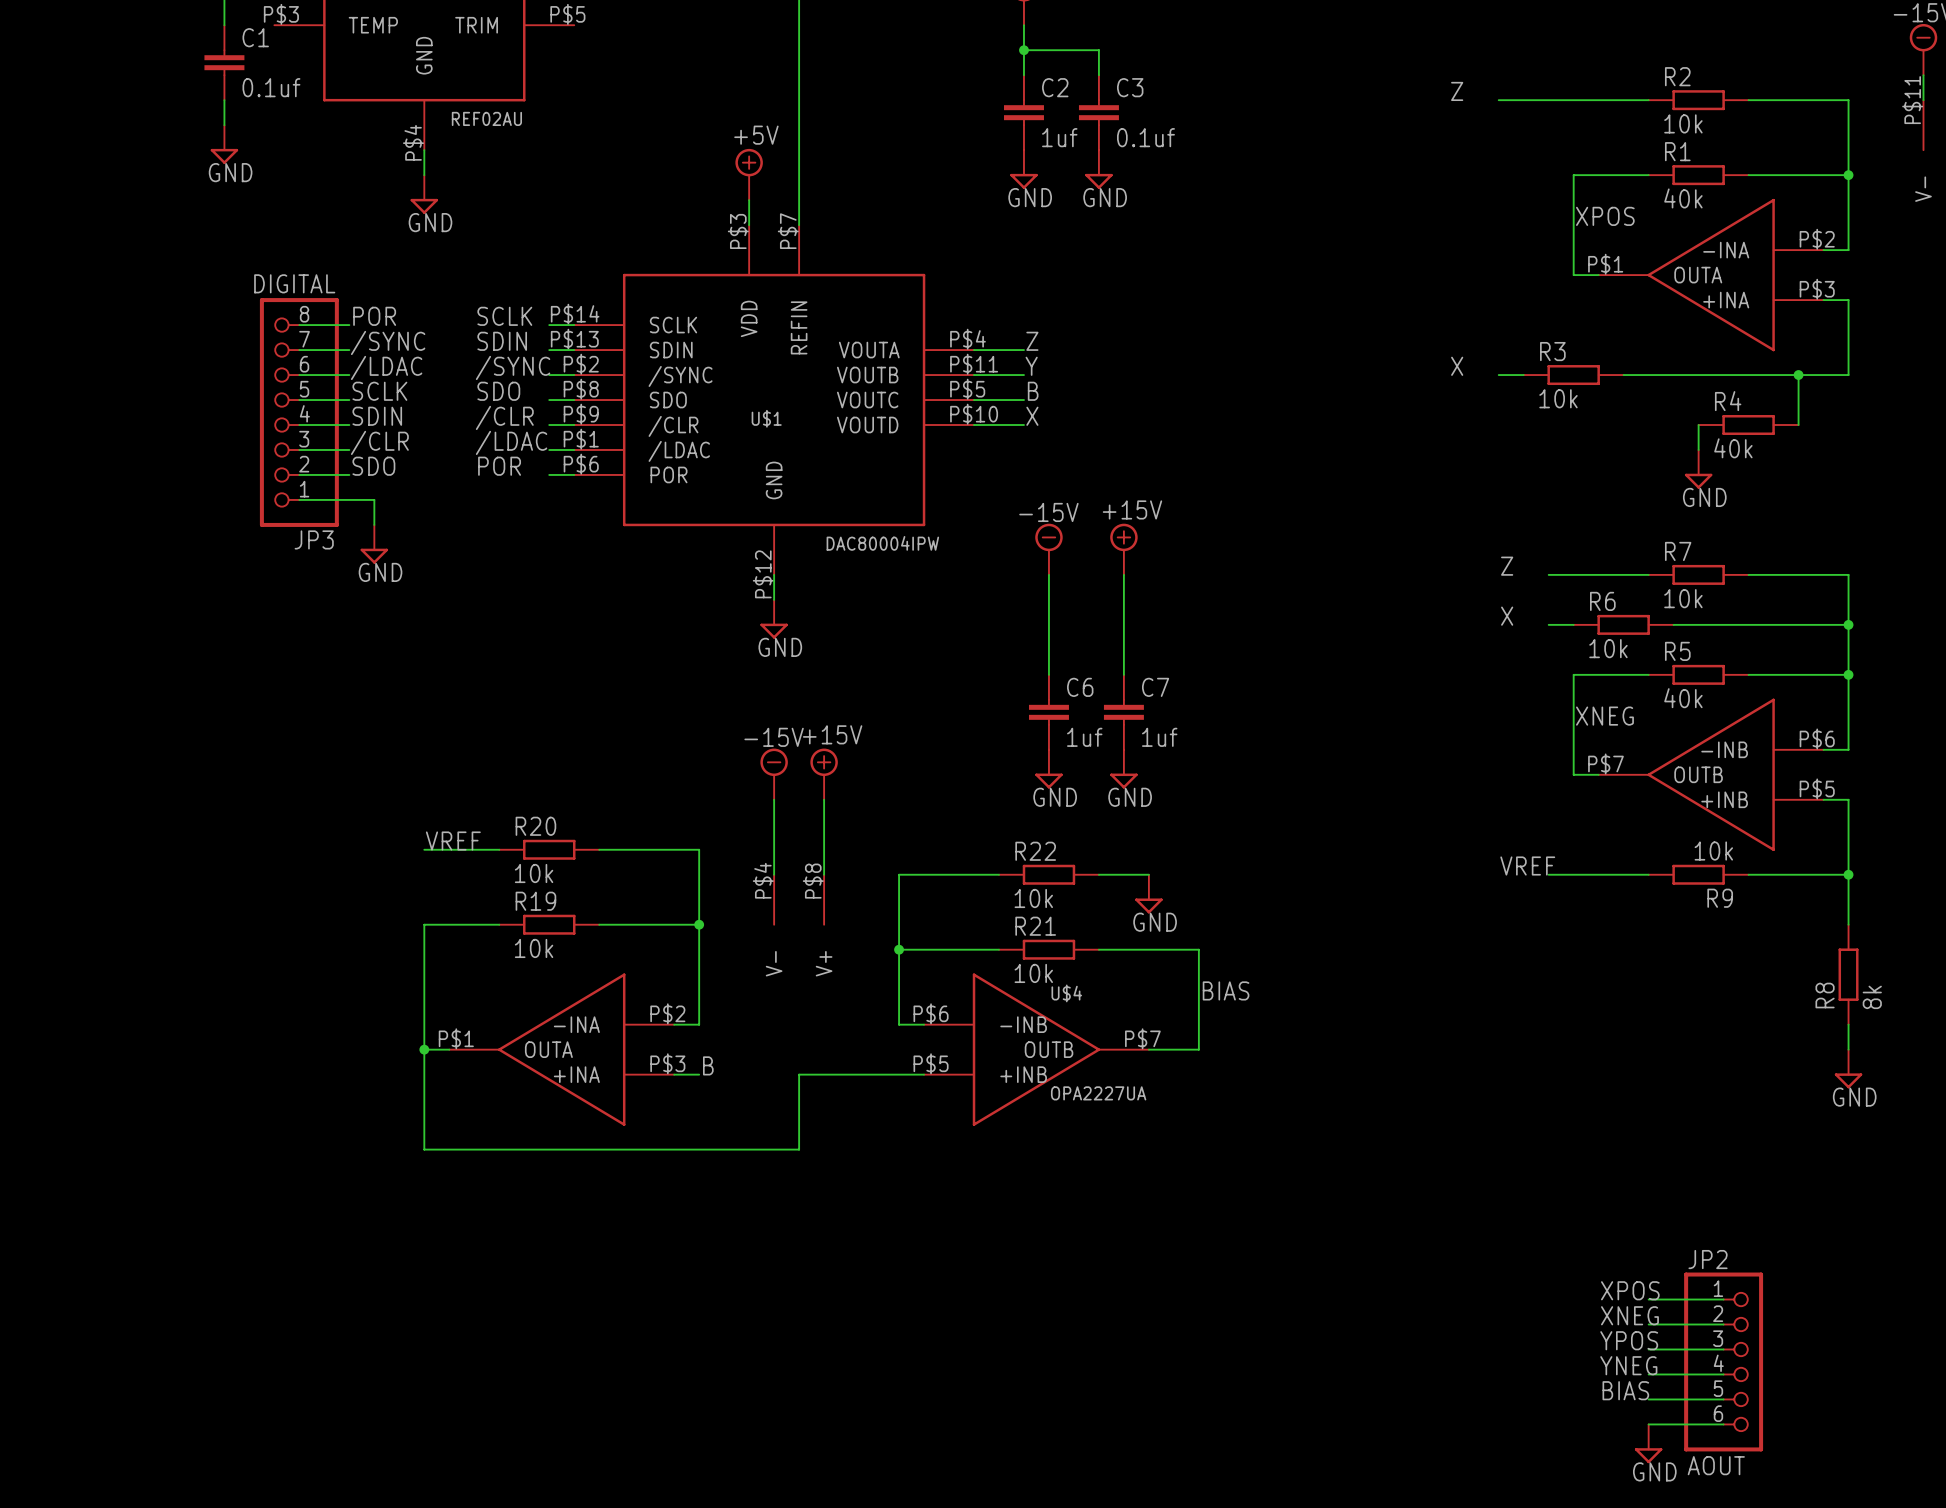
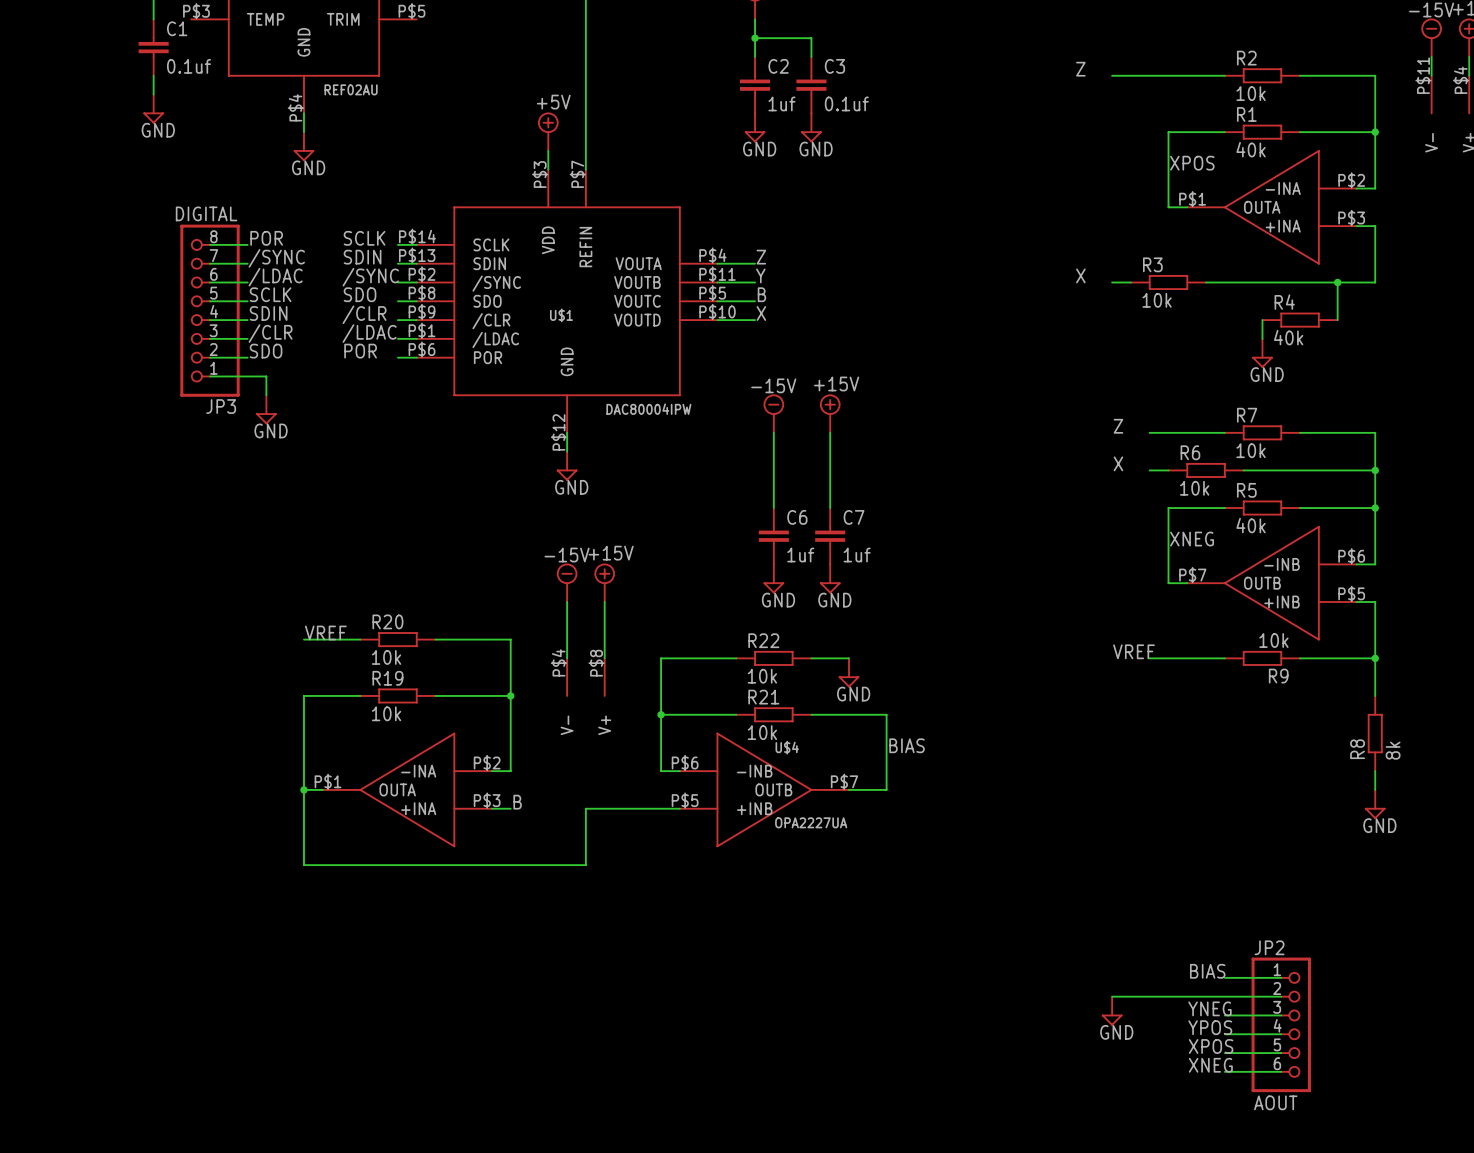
label: XPOS (1630, 1290) -> BIAS (1207, 971)
label position: XNEG (1629, 1315) -> XNEG (1210, 1065)
wire: none -> (1112, 996) (1224, 996)
label: YPOS (1629, 1340) -> YNEG (1209, 1008)
label: YNEG (1628, 1365) -> YPOS (1210, 1027)
label: BIAS (1625, 1390) -> XPOS (1211, 1046)
power symbol position: GND (1648, 1443) -> GND (1112, 1011)

